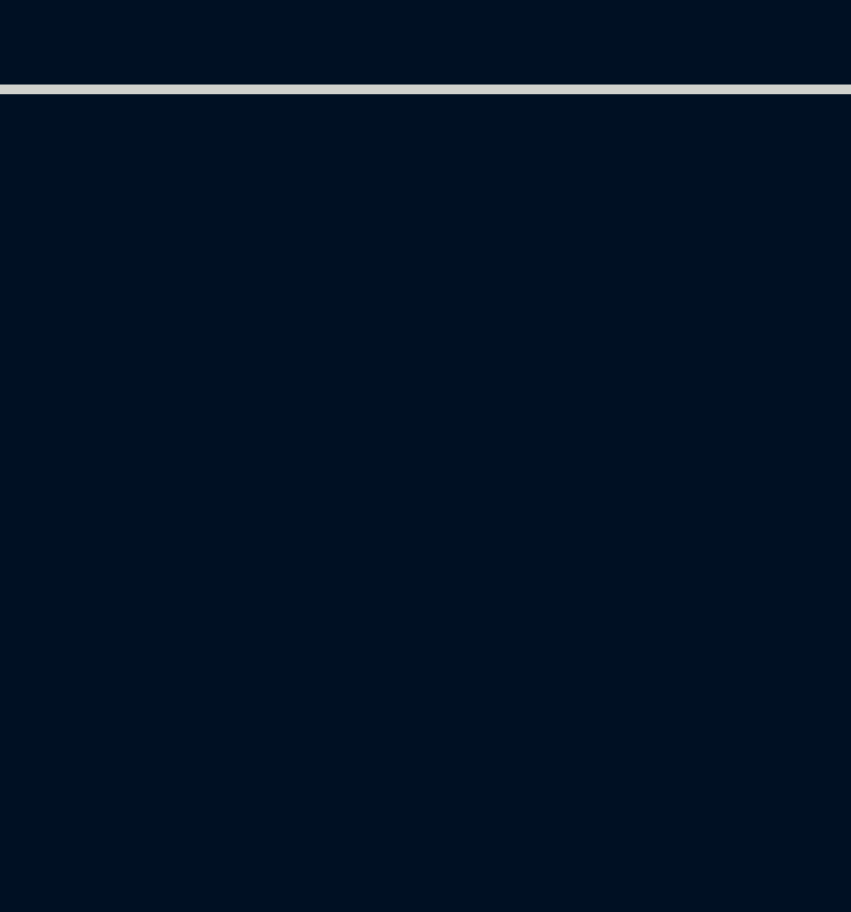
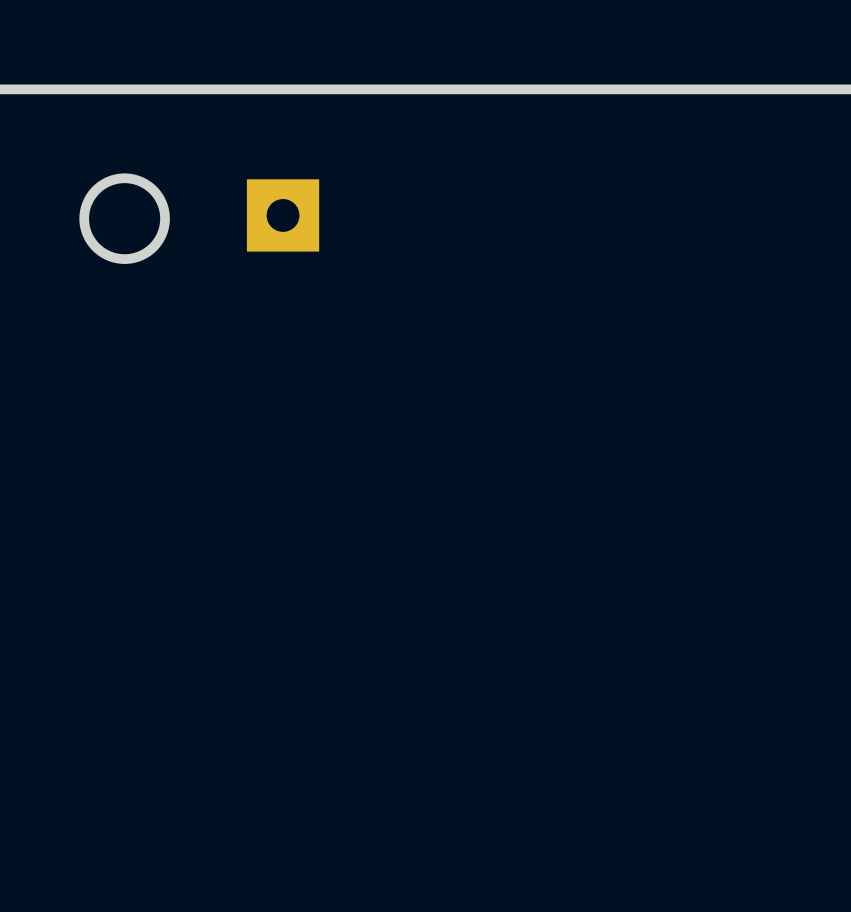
round board edge: none -> [79, 173, 170, 264]
part: none -> (283, 215)

